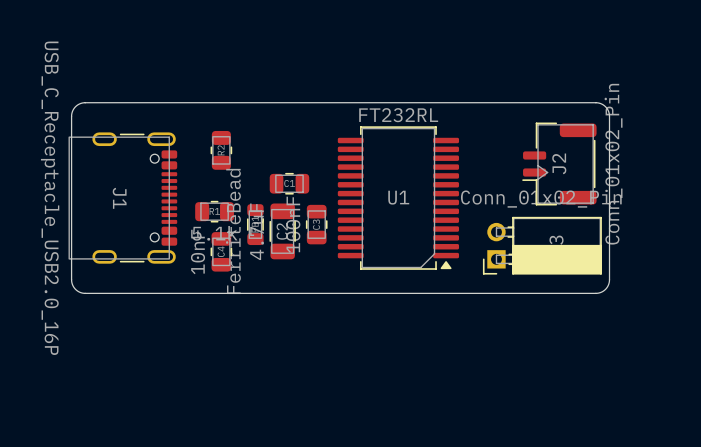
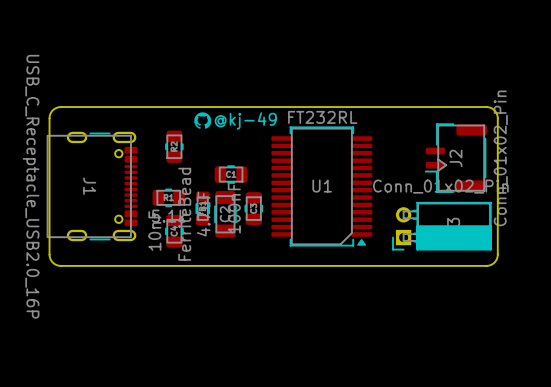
drawing: none -> [194, 112, 212, 129]
text: none -> @kj-49 (245, 120)

